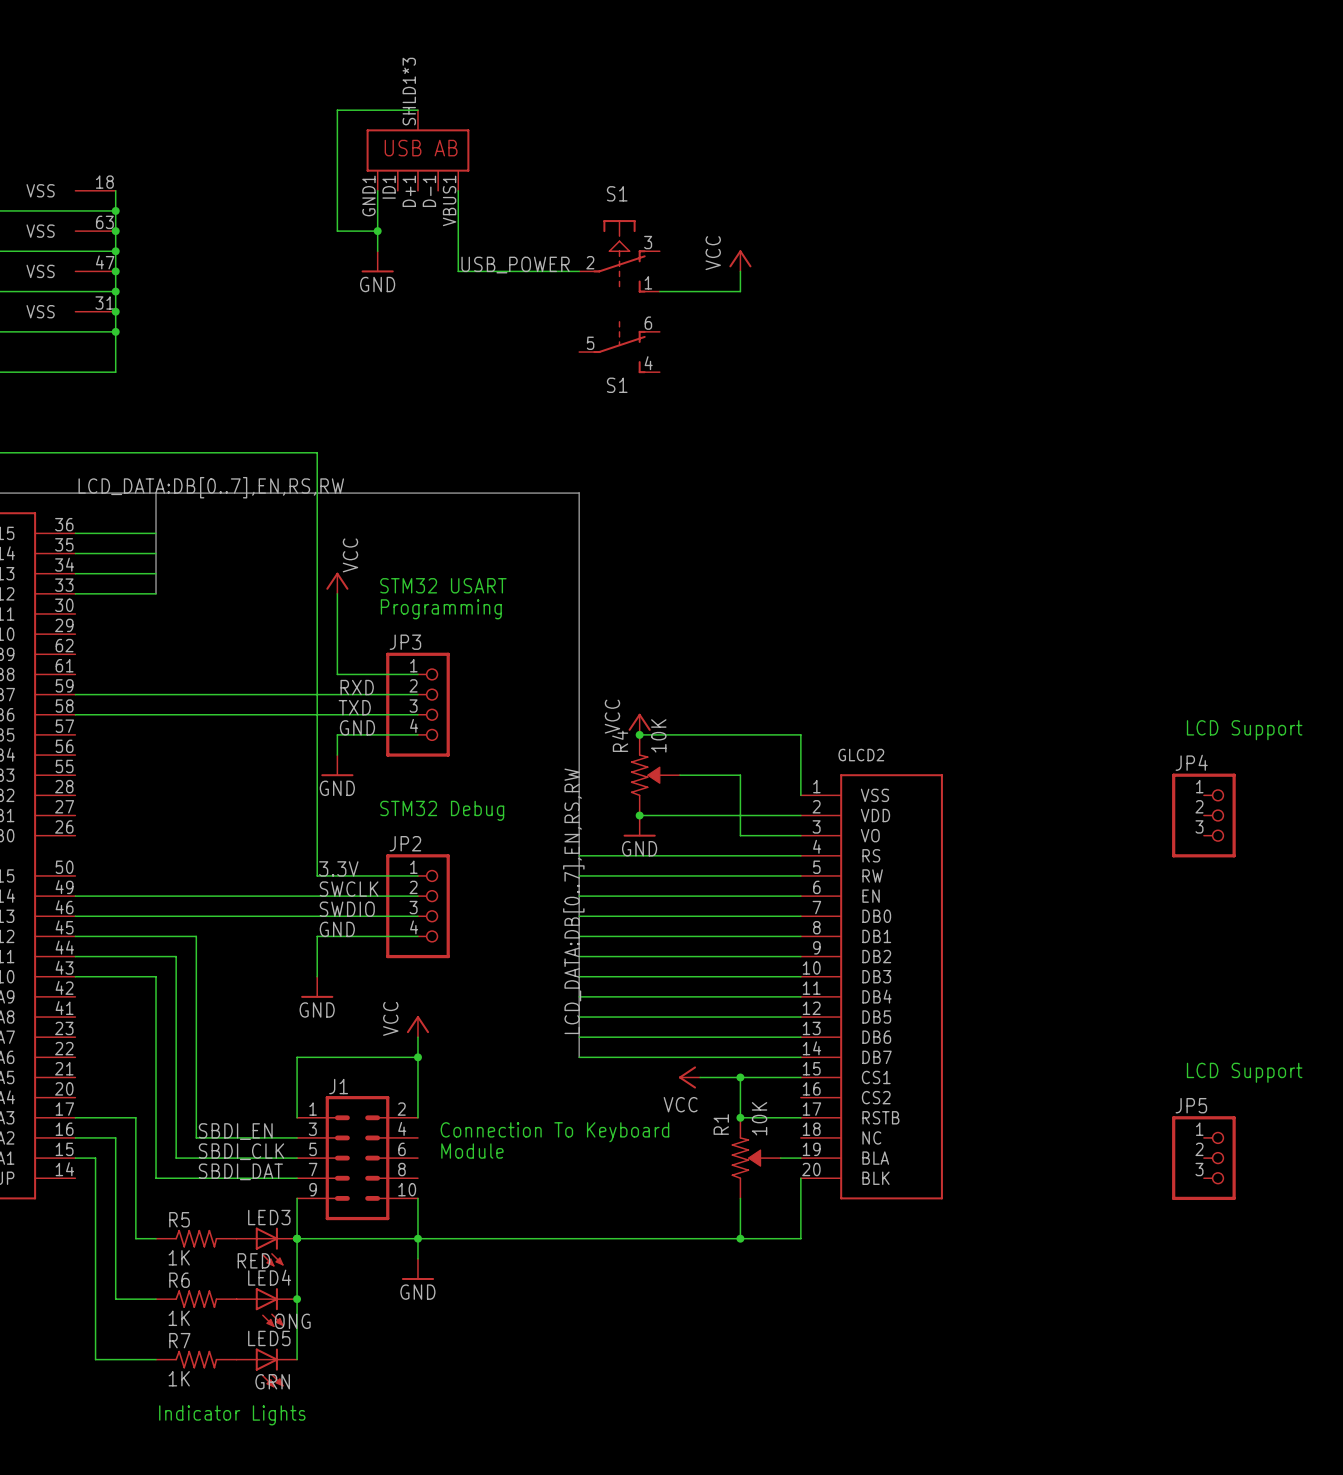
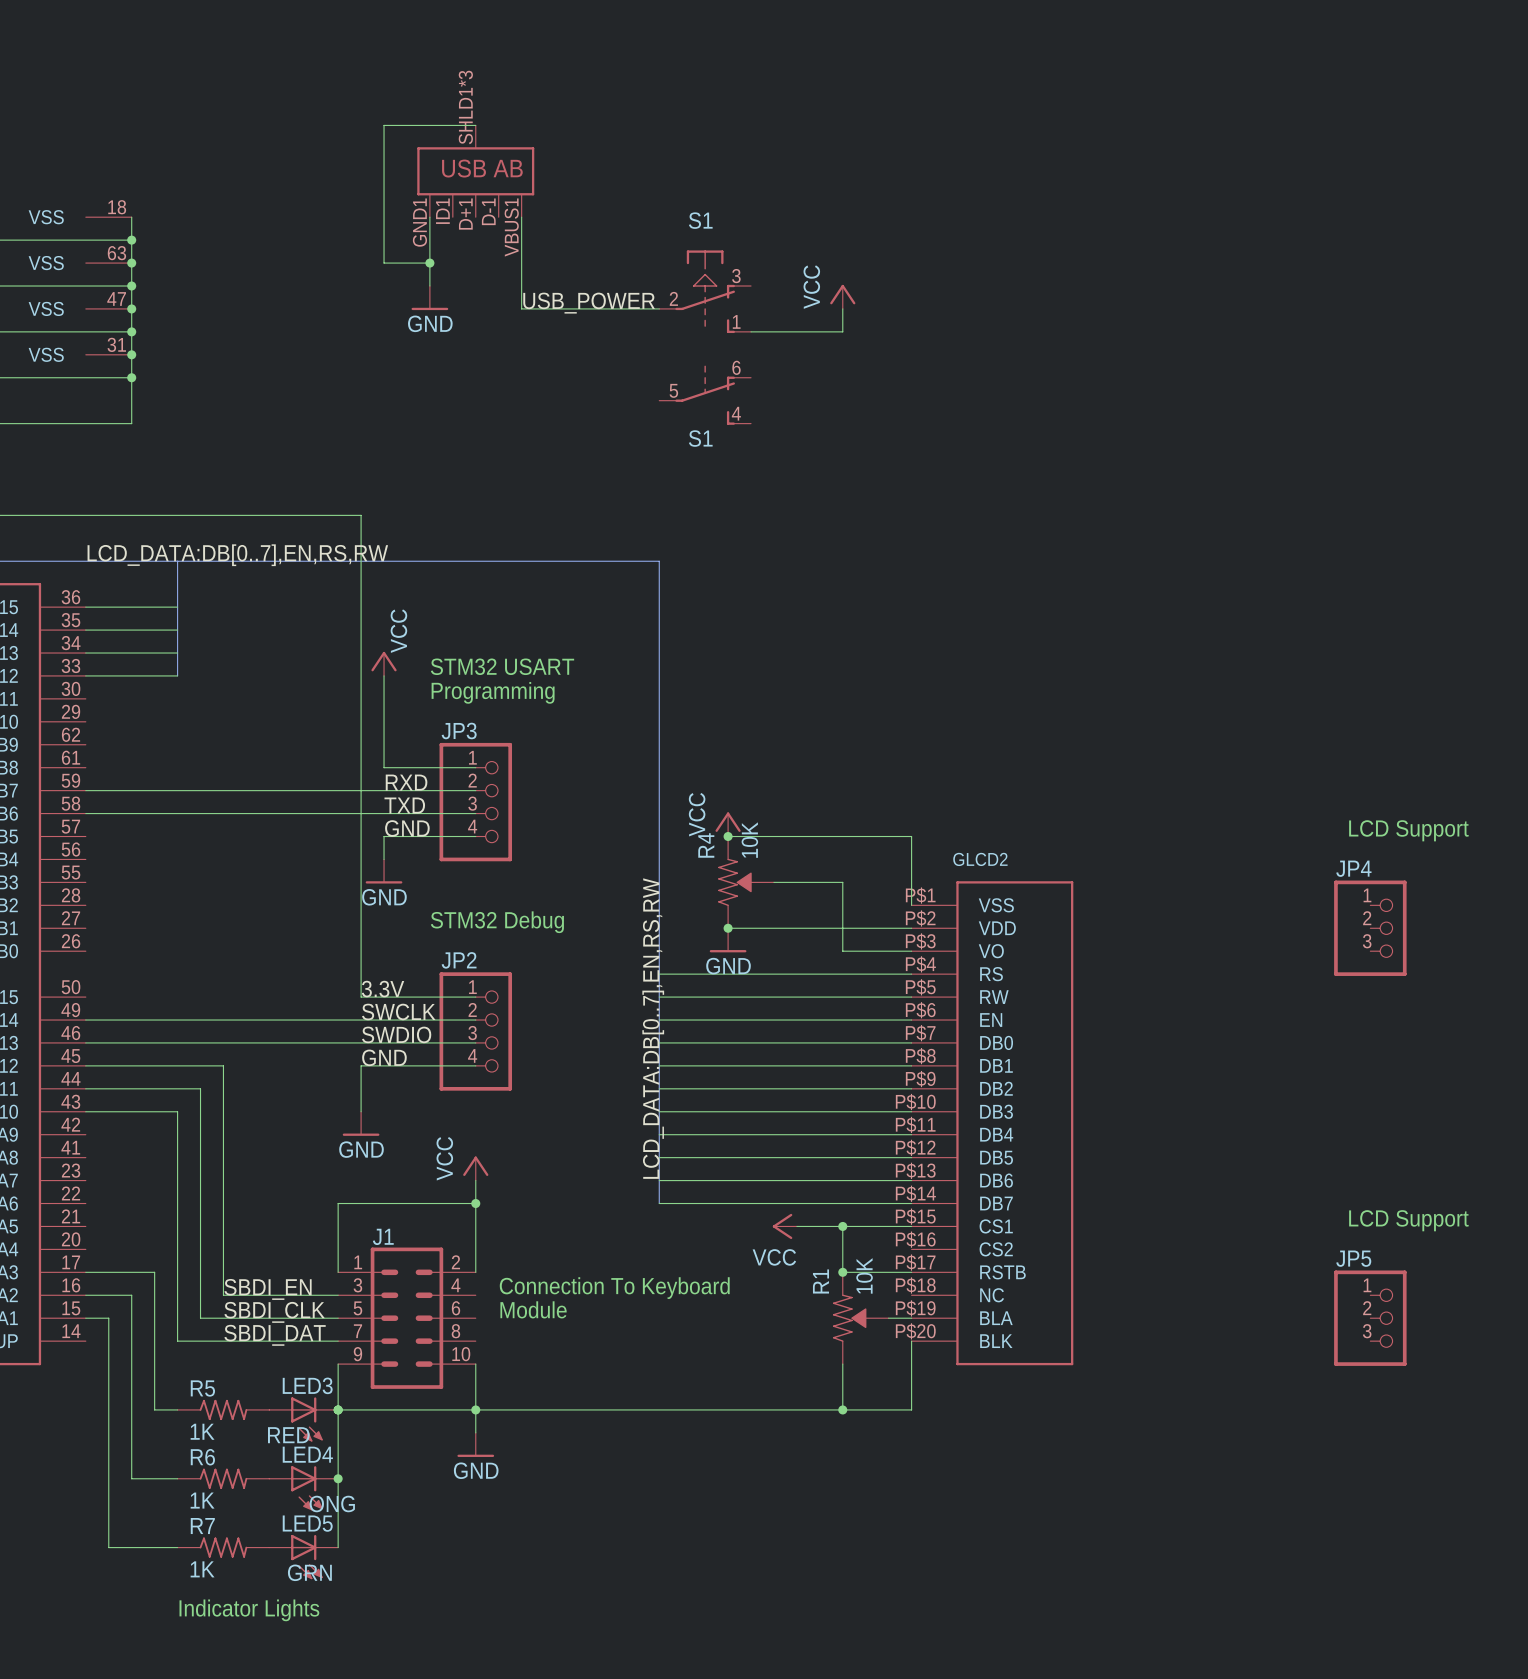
GLCD2 symbol: [800, 774, 943, 1200] -> [911, 881, 1074, 1366]

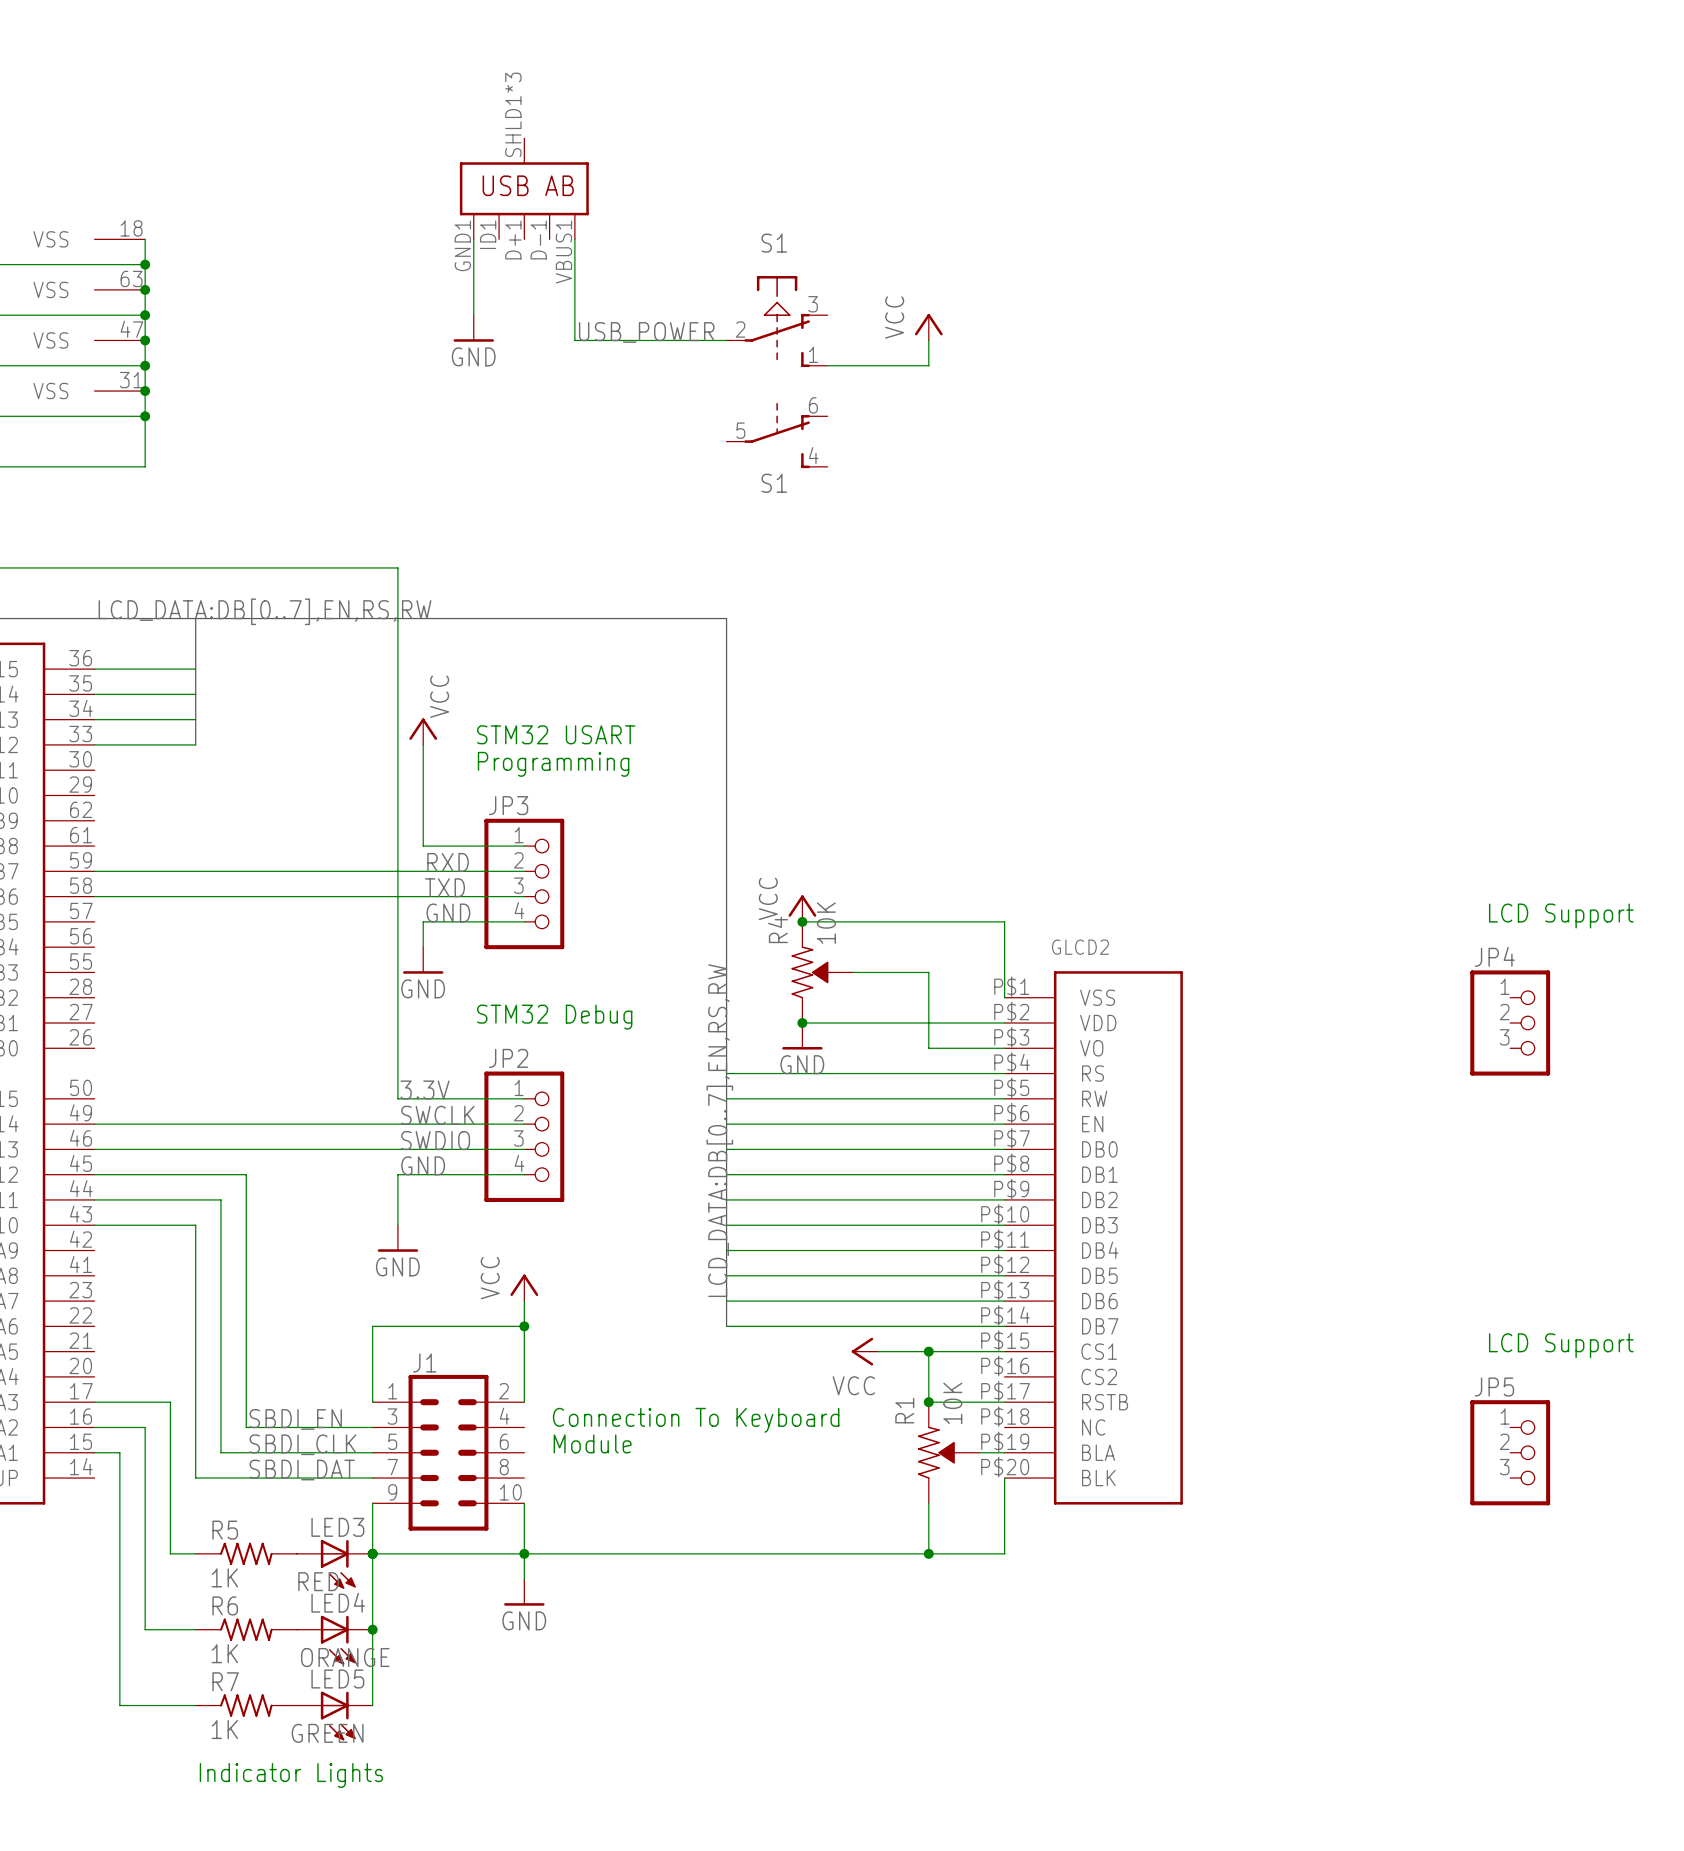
wire: (475, 125) (384, 125) (384, 263) (429, 263) -> none
junction: (429, 263) -> none
LED4 value: ONG (332, 1503) -> ORANGE (345, 1657)
LED5 value: GRN (309, 1572) -> GREEN (327, 1733)

